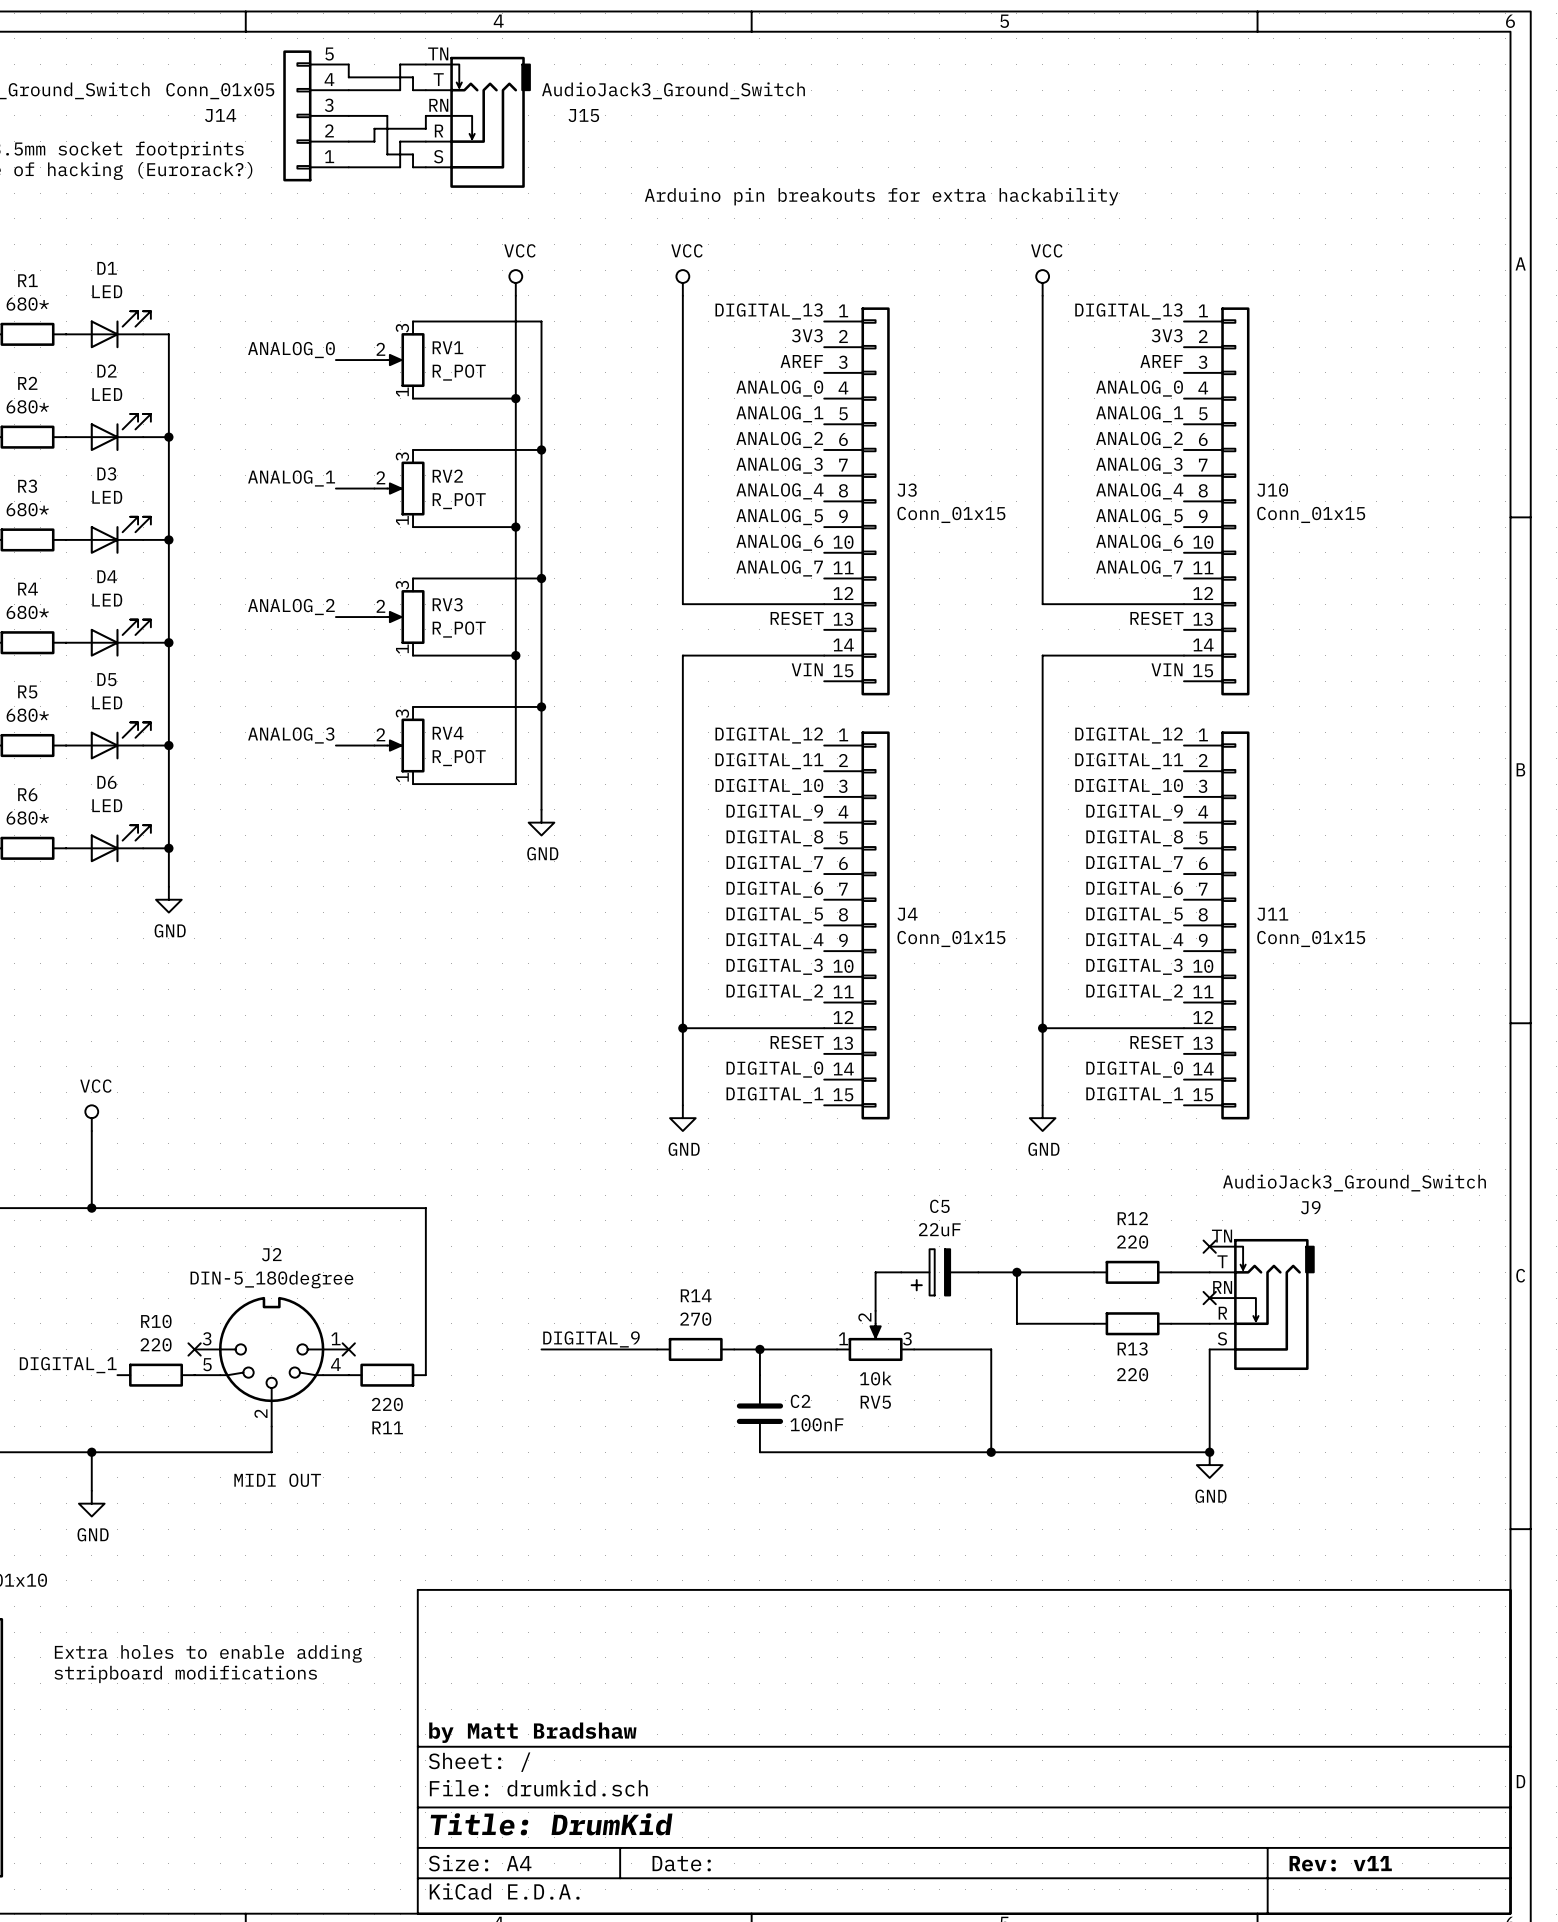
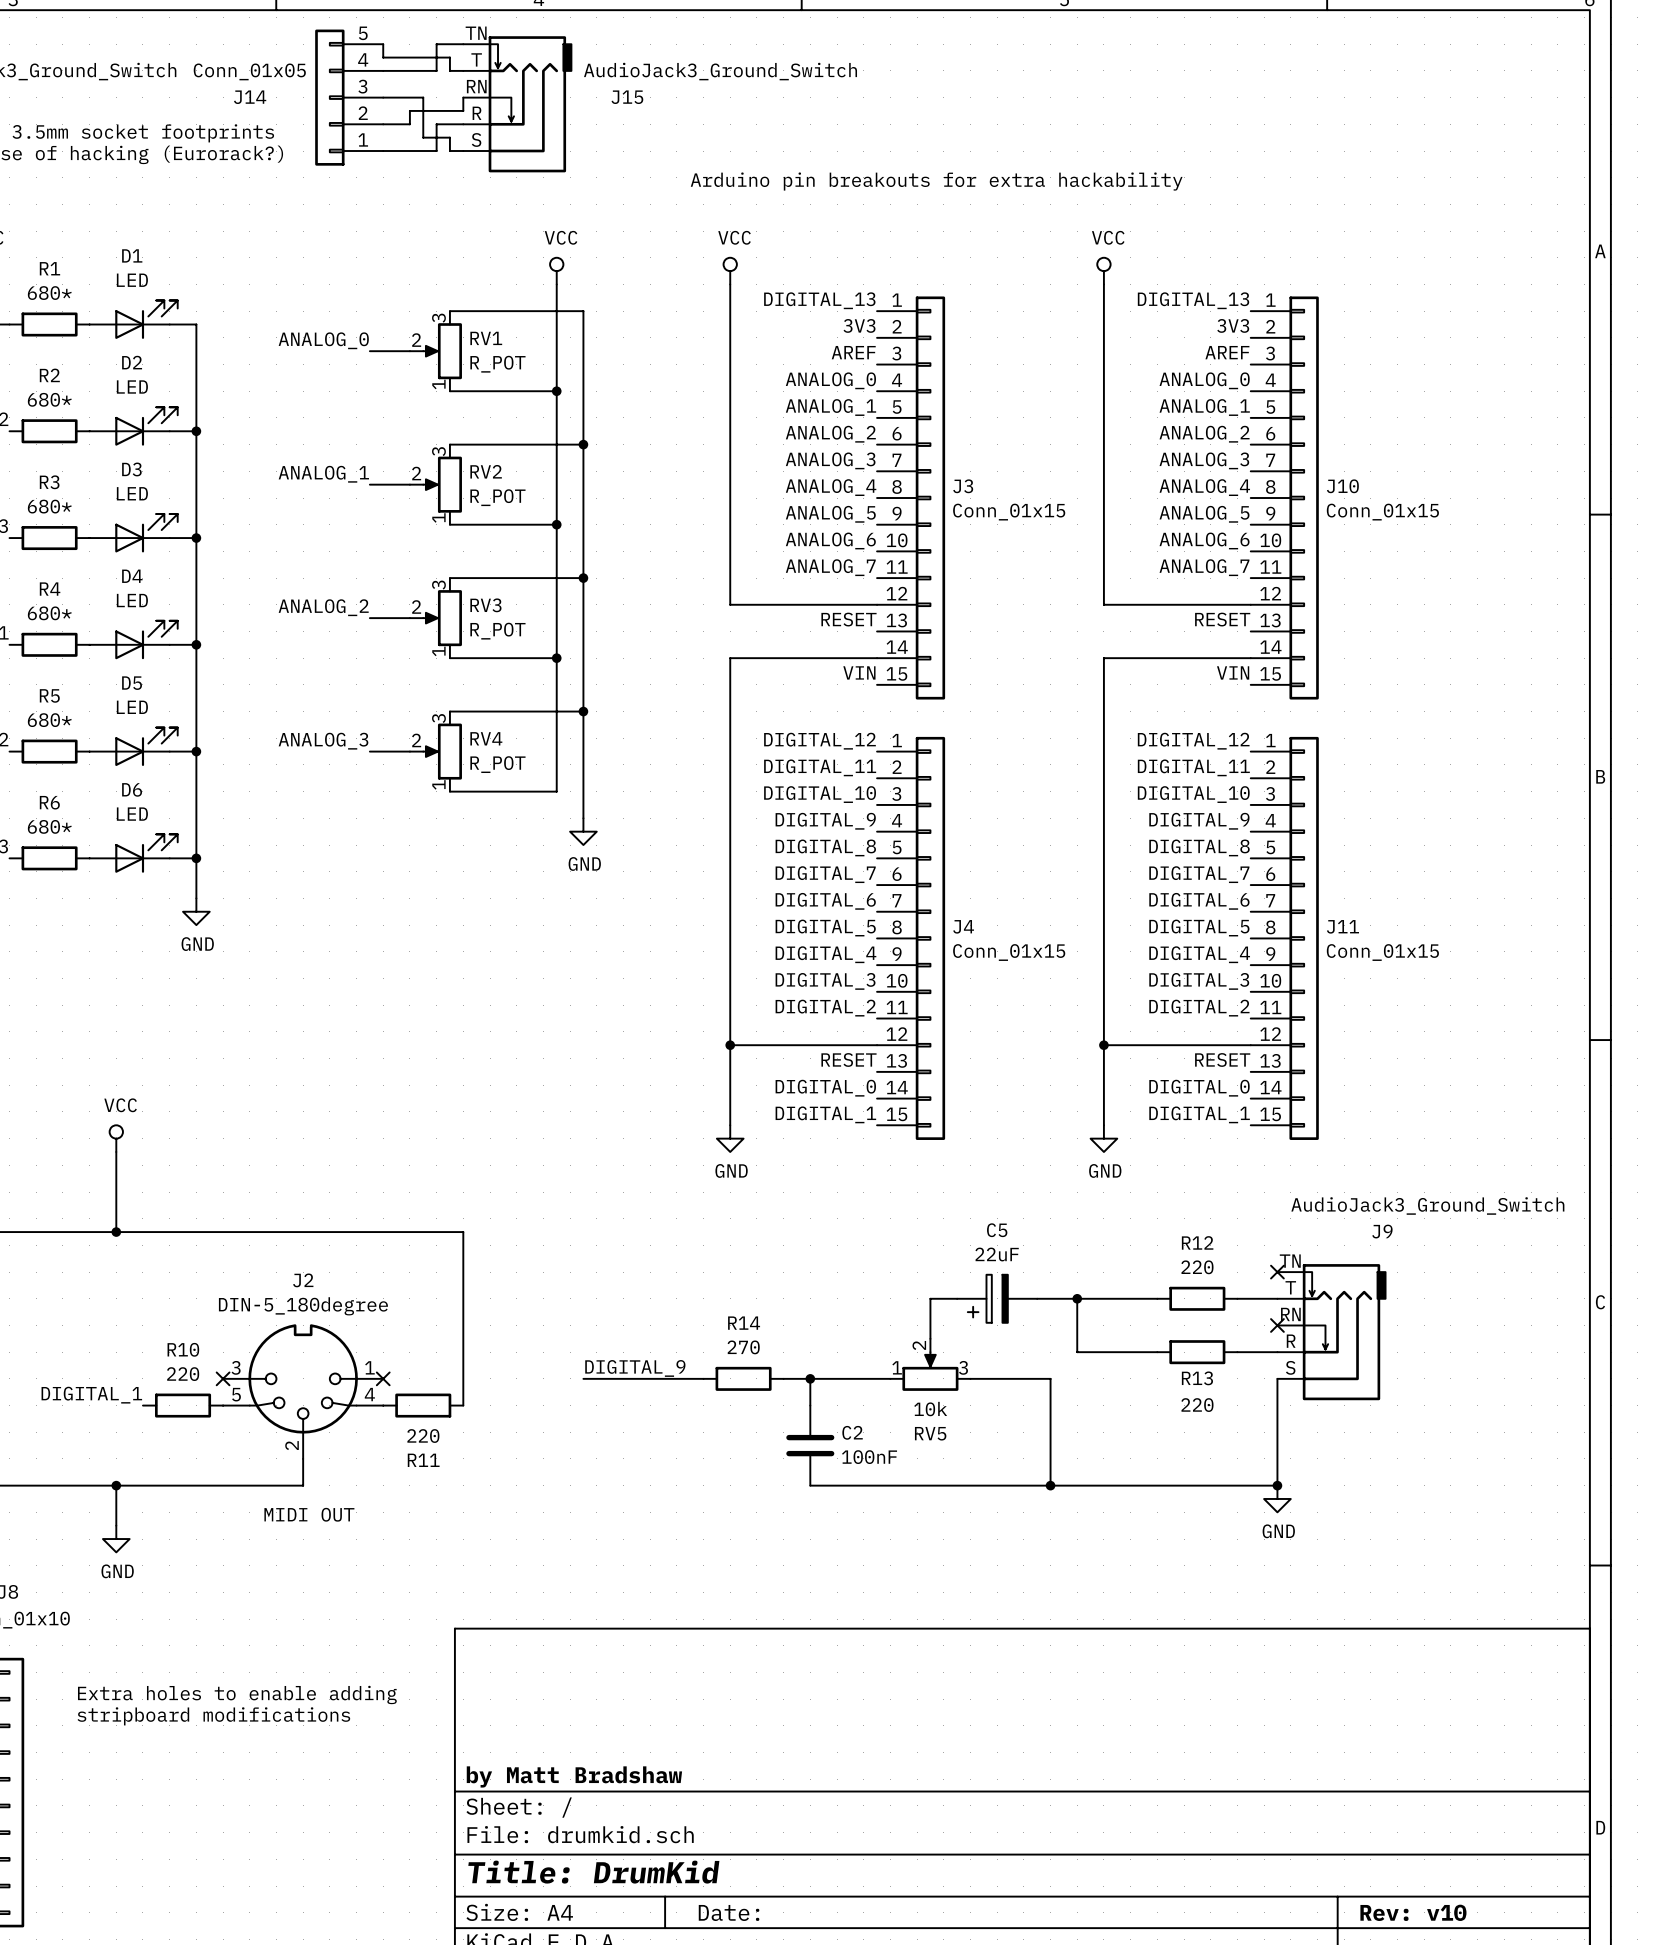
title block: Rev: v11 (1340, 1863) -> Rev: v10 (1413, 1912)

